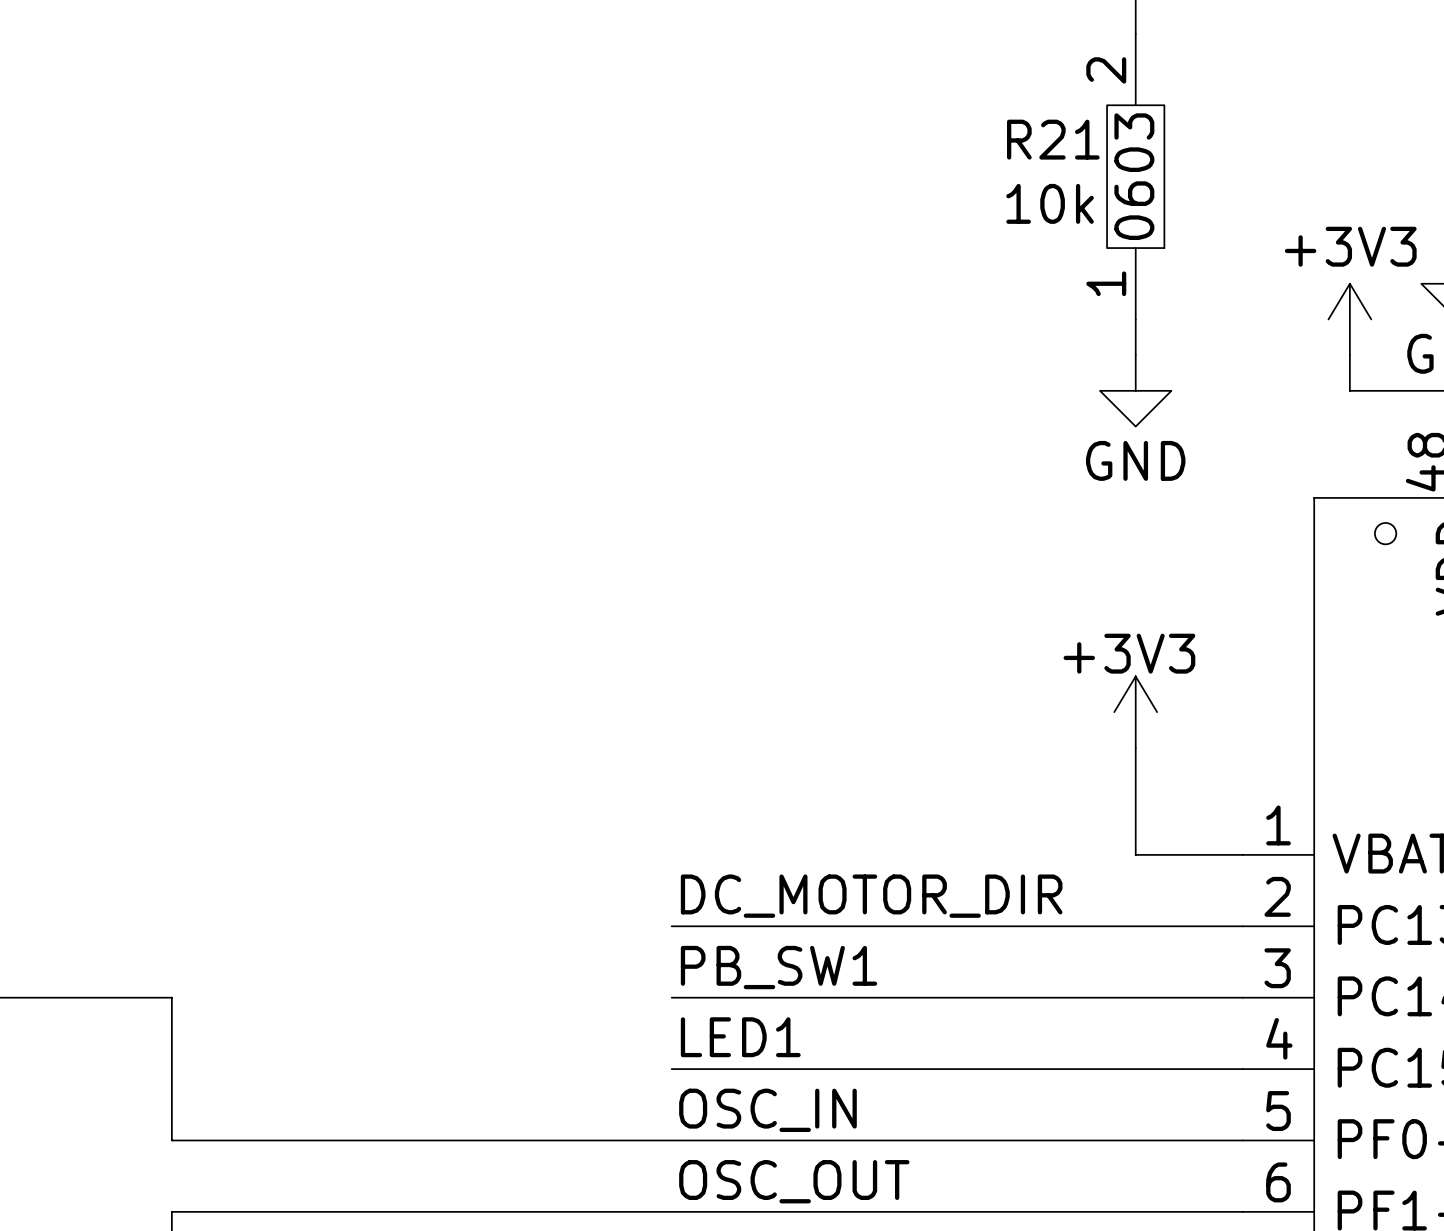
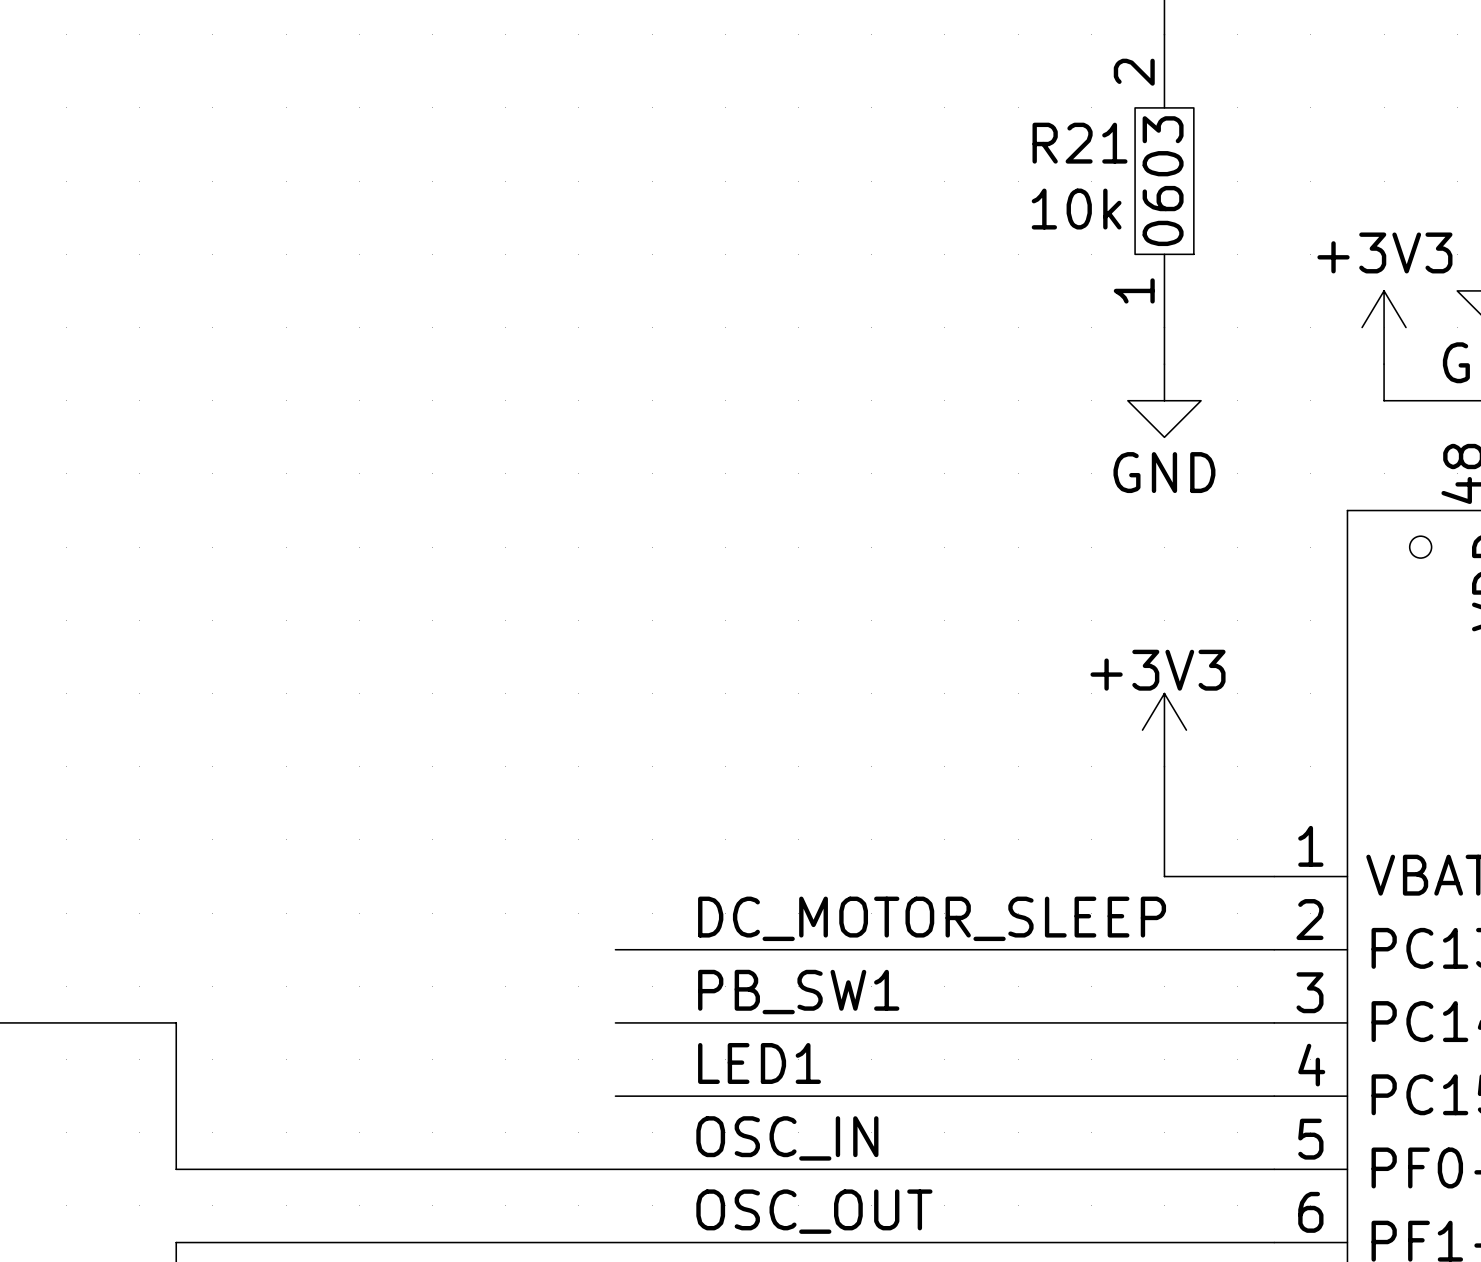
label: DC_MOTOR_DIR (871, 896) -> DC_MOTOR_SLEEP (932, 918)
wire: none -> (615, 949) (688, 949)
wire: none -> (615, 1022) (688, 1022)
wire: none -> (615, 1096) (688, 1096)

